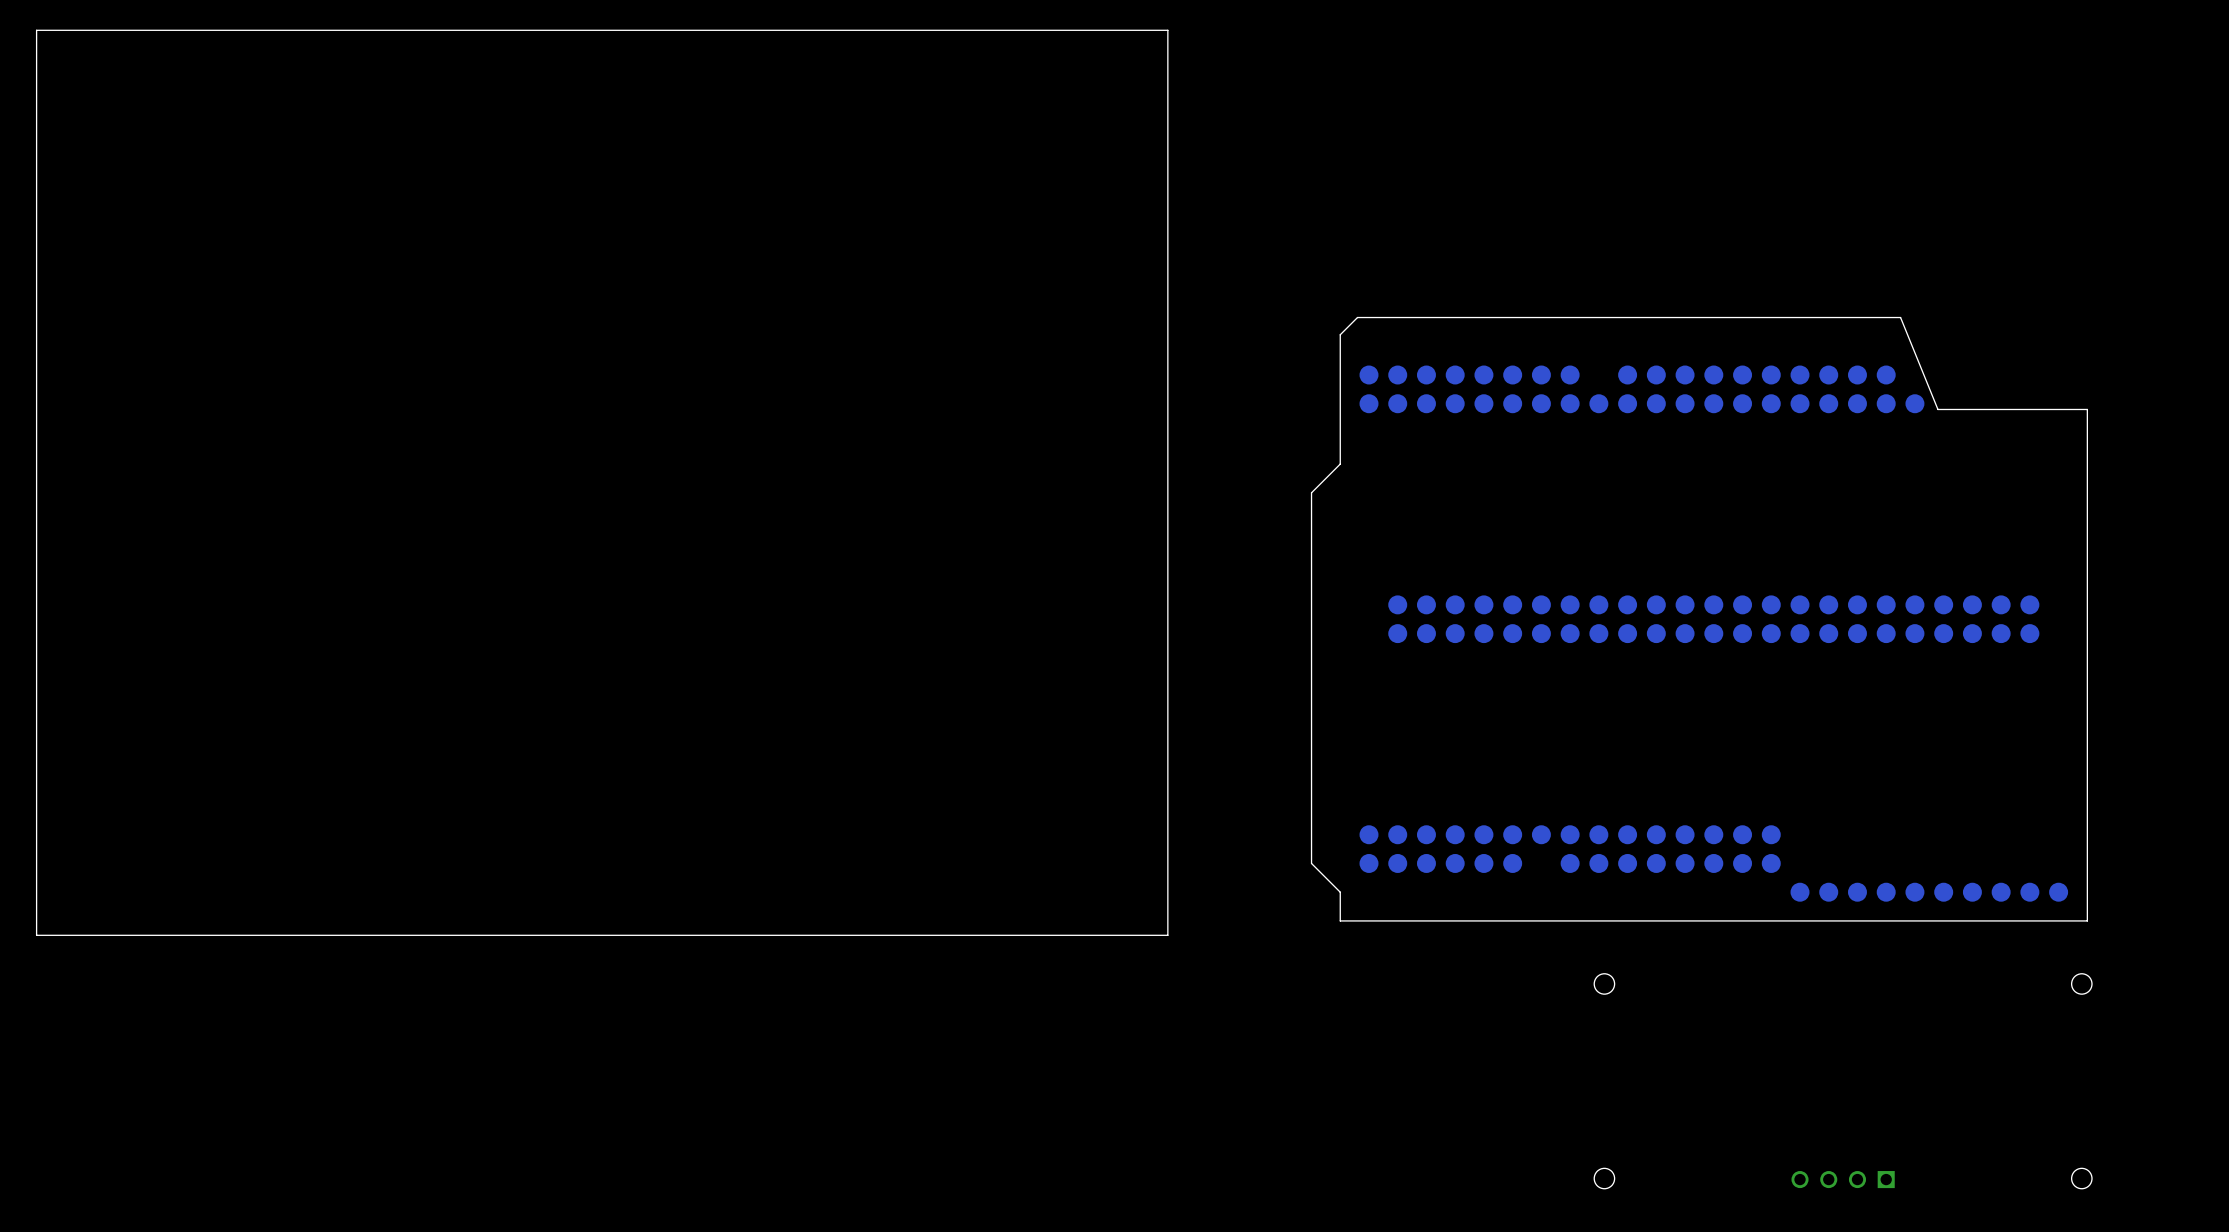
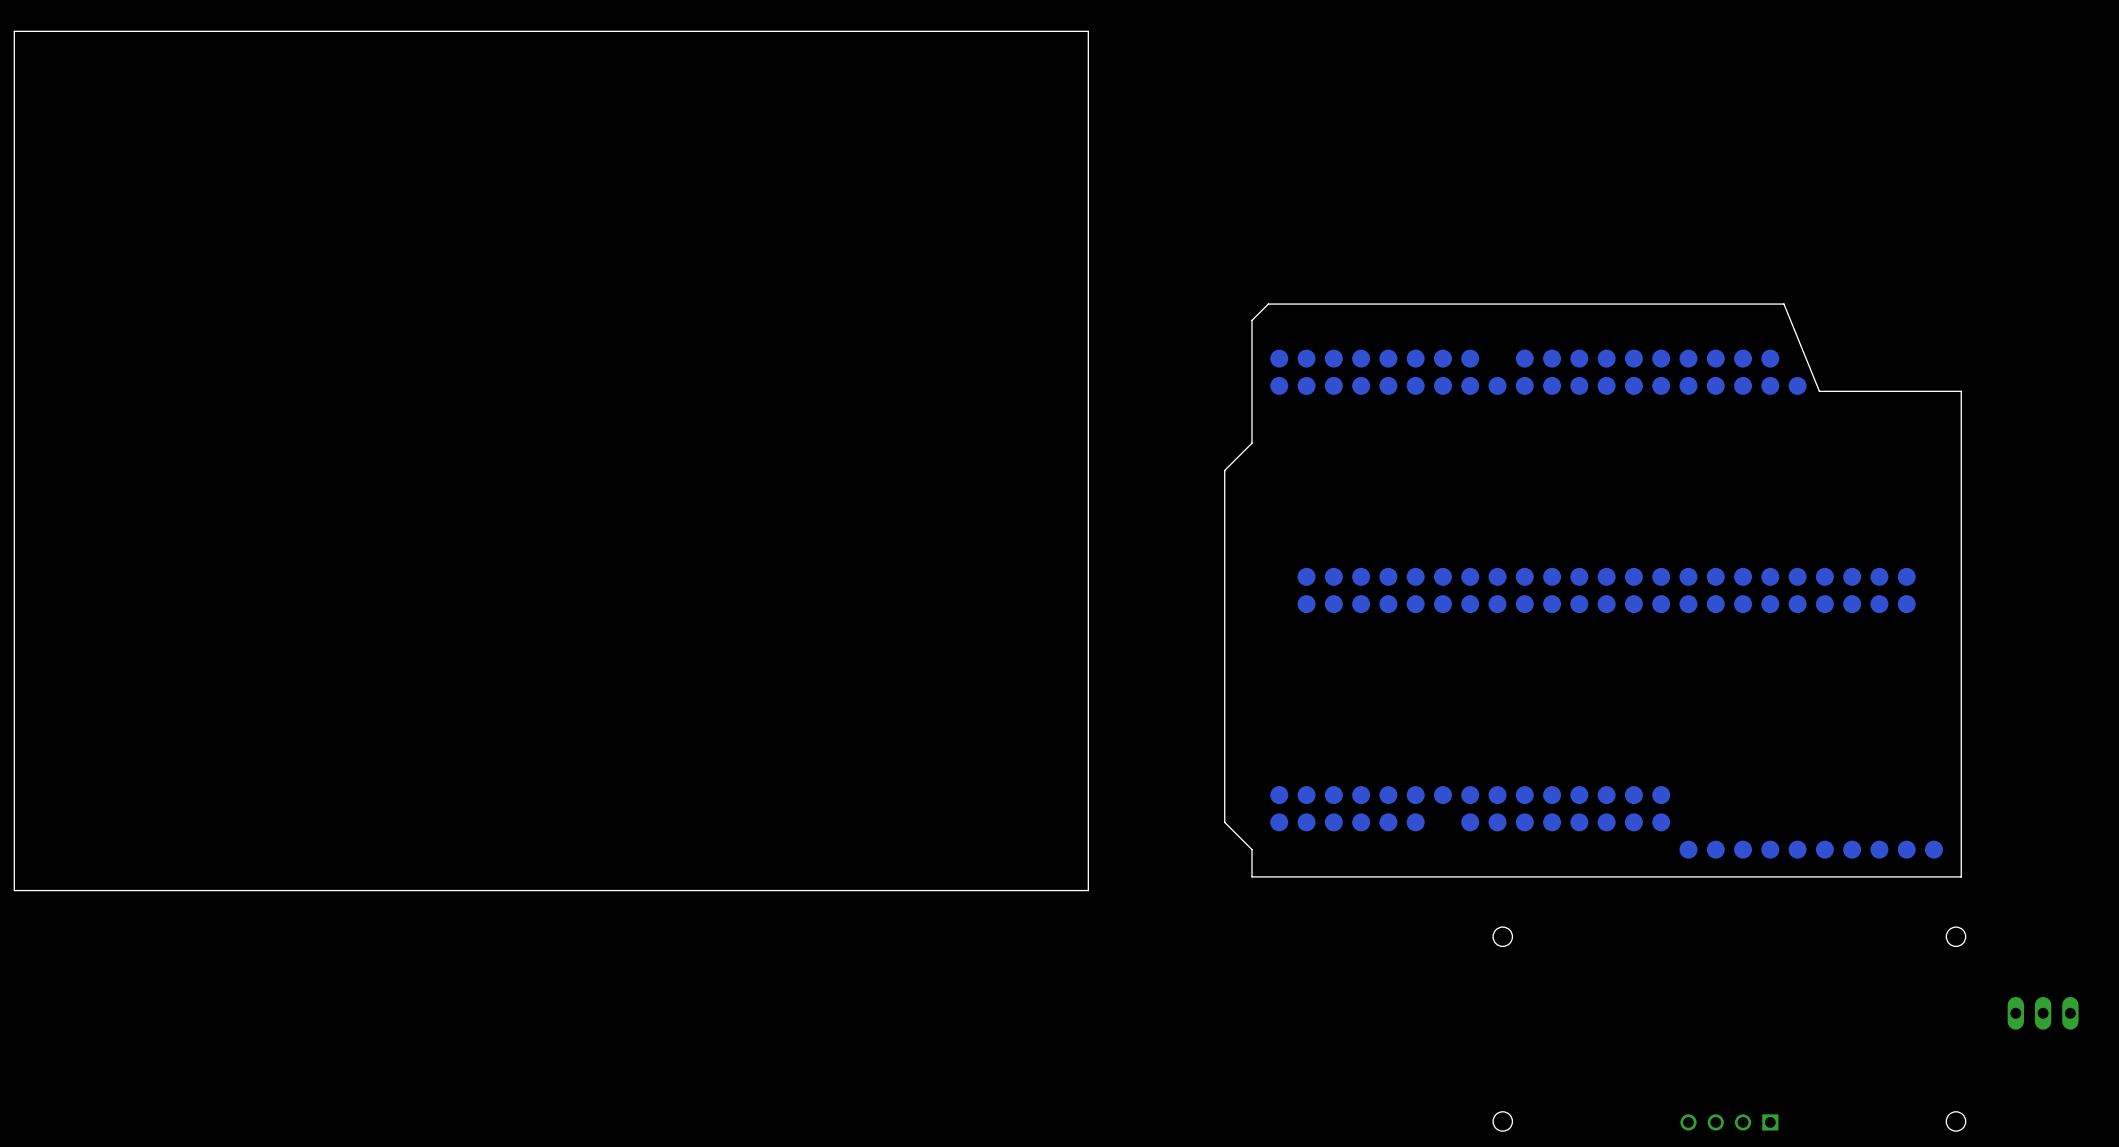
part: none -> (2043, 1013)

